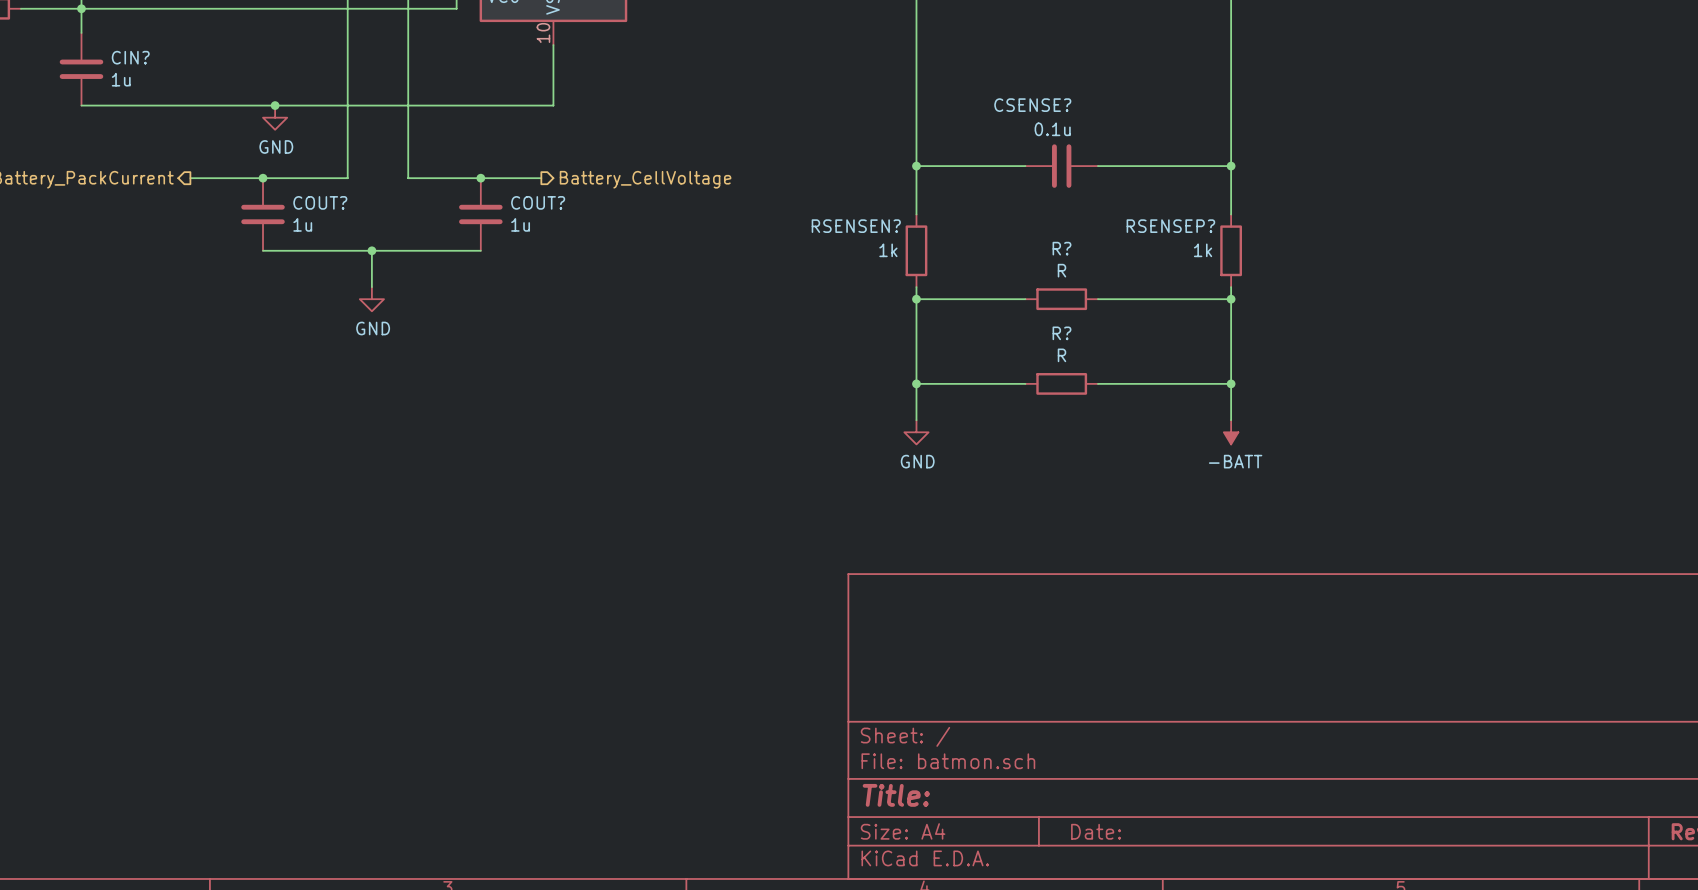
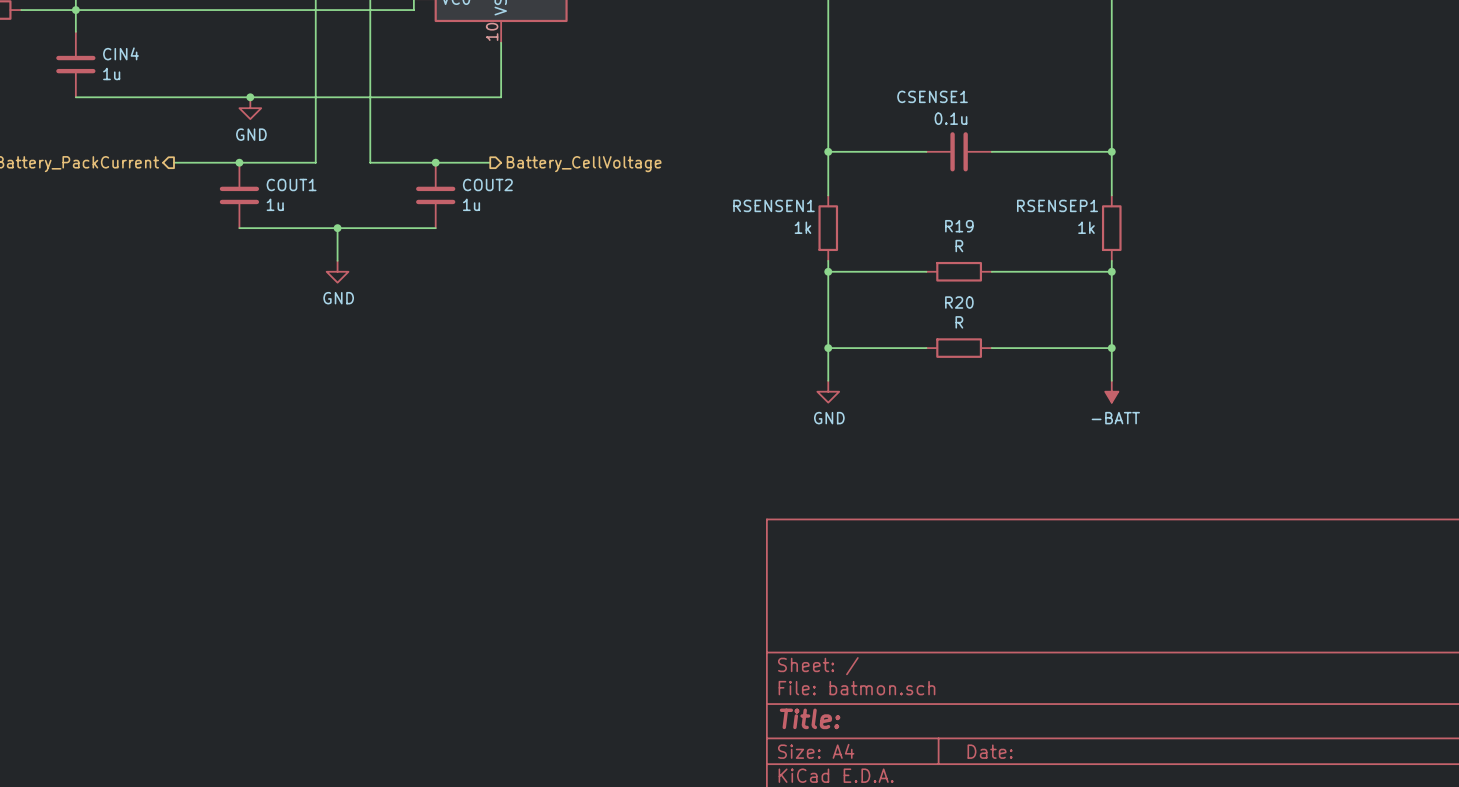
CIN? name: CIN? (130, 57) -> CIN4 (121, 53)
CSENSE? name: CSENSE? (1032, 105) -> CSENSE1 (932, 96)
COUT? name: COUT? (320, 202) -> COUT1 (291, 184)
COUT? name: COUT? (538, 202) -> COUT2 (487, 184)
RSENSEN? name: RSENSEN? (856, 226) -> RSENSEN1 (774, 205)
RSENSEP? name: RSENSEP? (1170, 226) -> RSENSEP1 (1057, 205)
R? name: R? (1061, 248) -> R19 (959, 226)
R? name: R? (1061, 333) -> R20 (959, 302)

